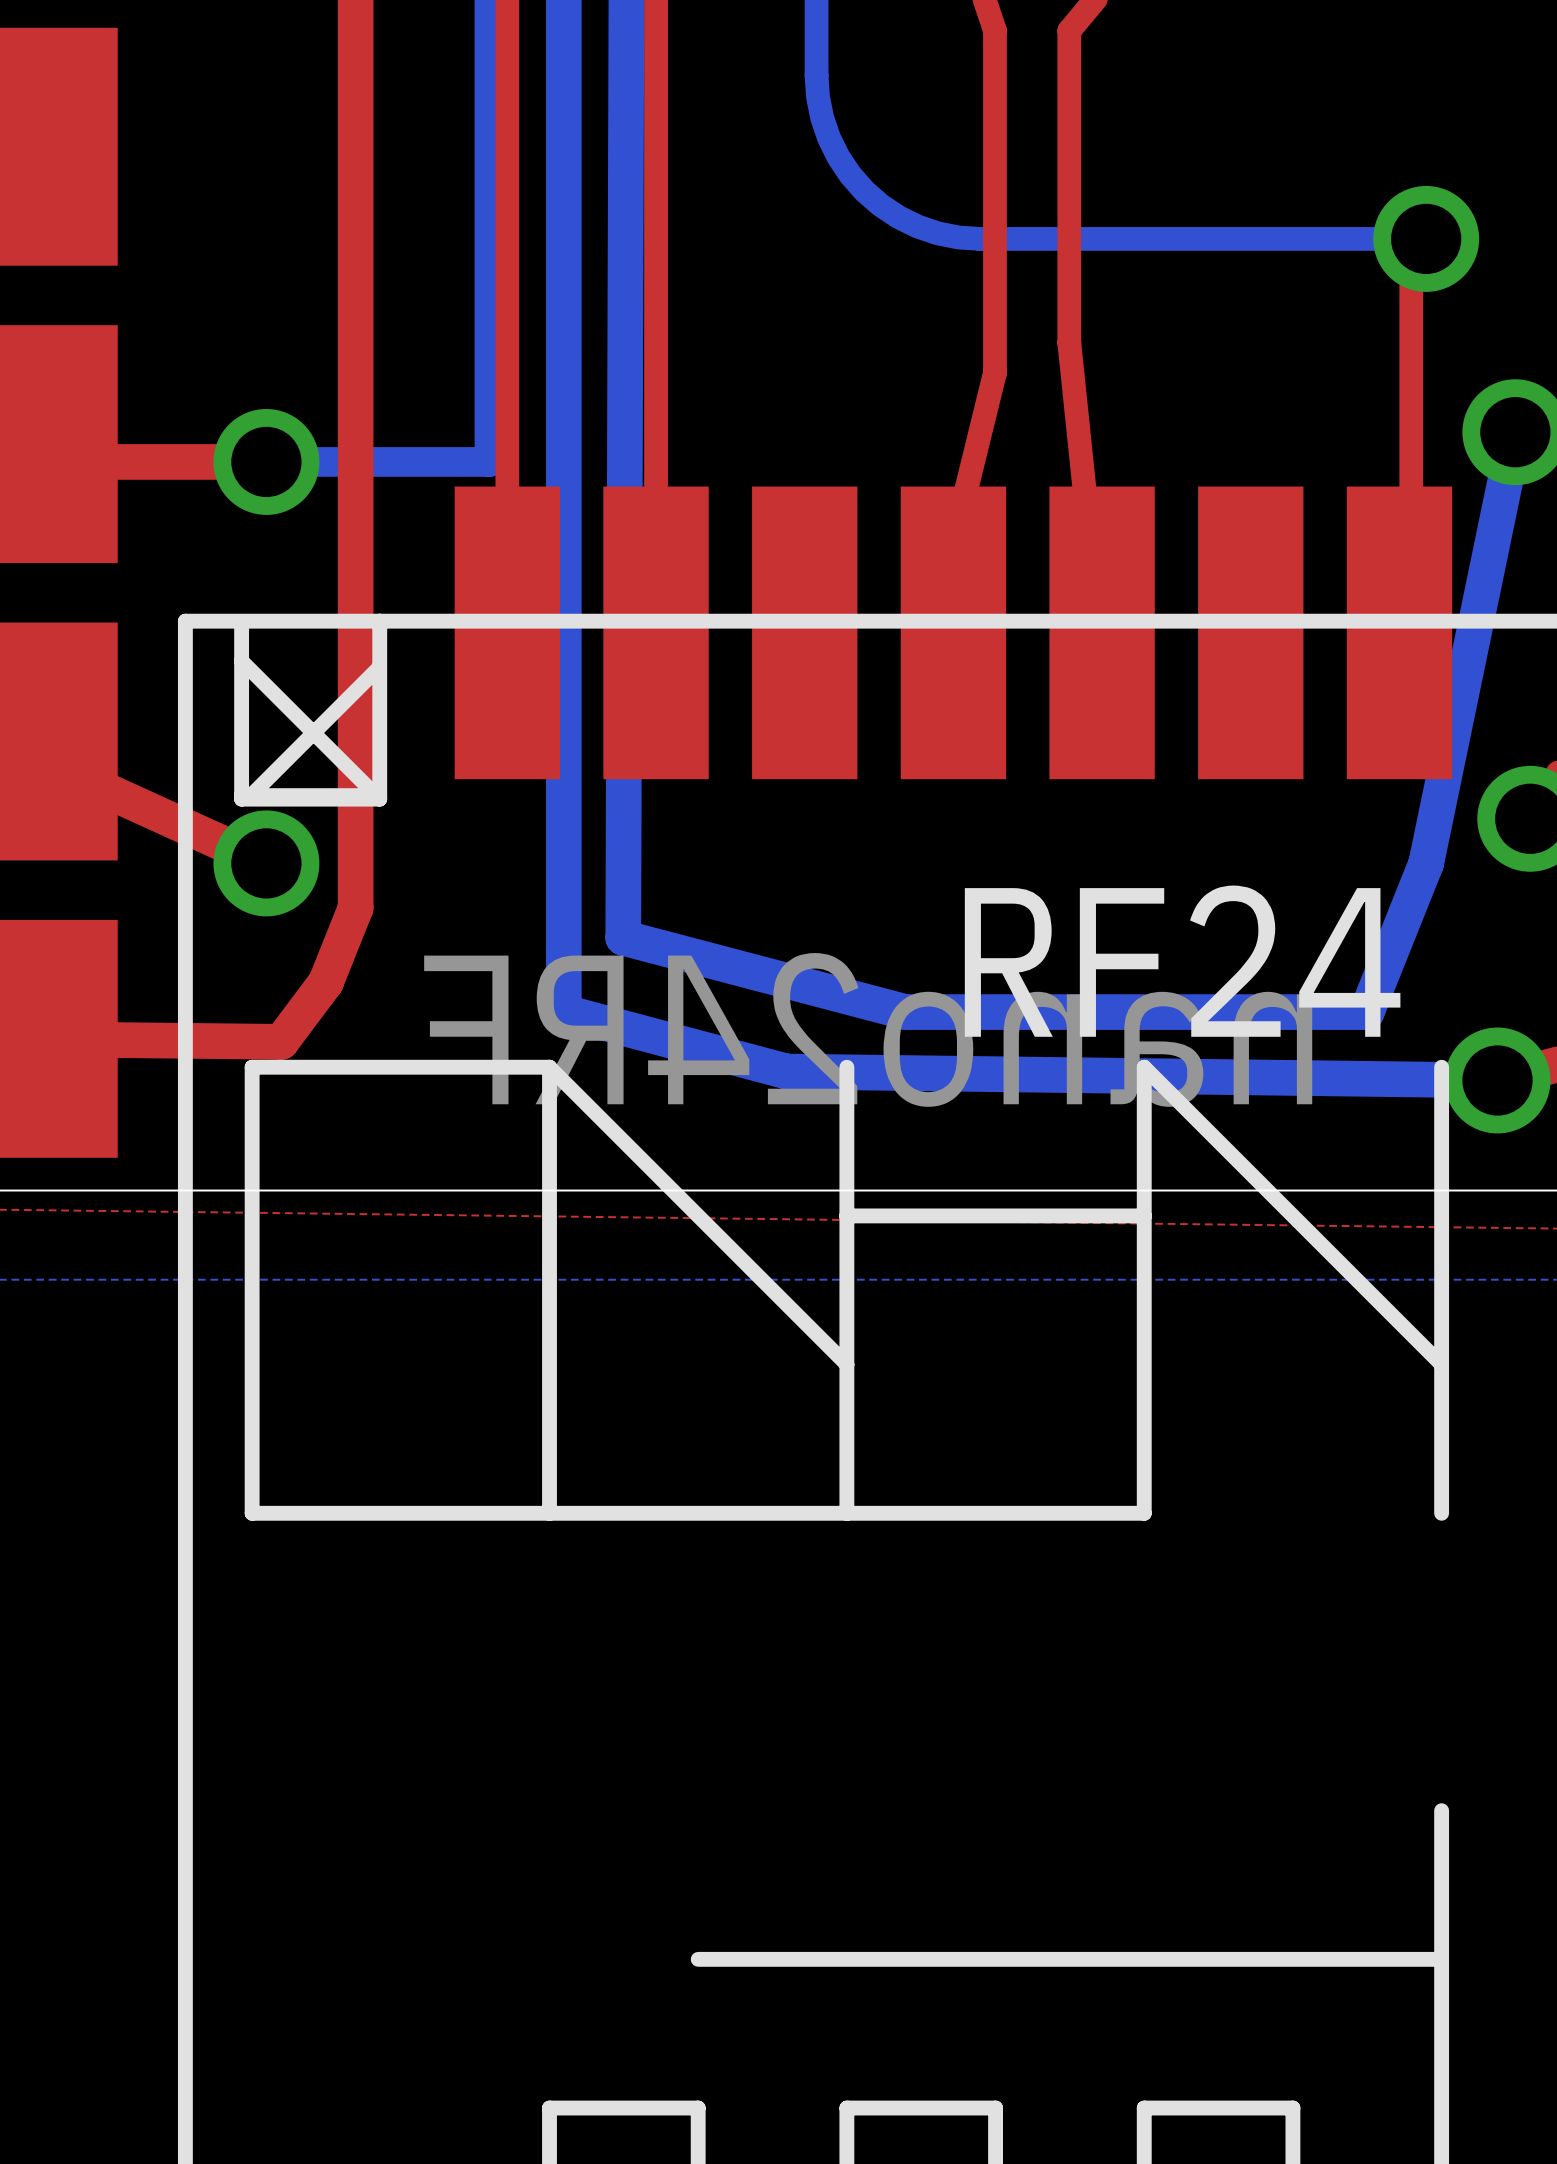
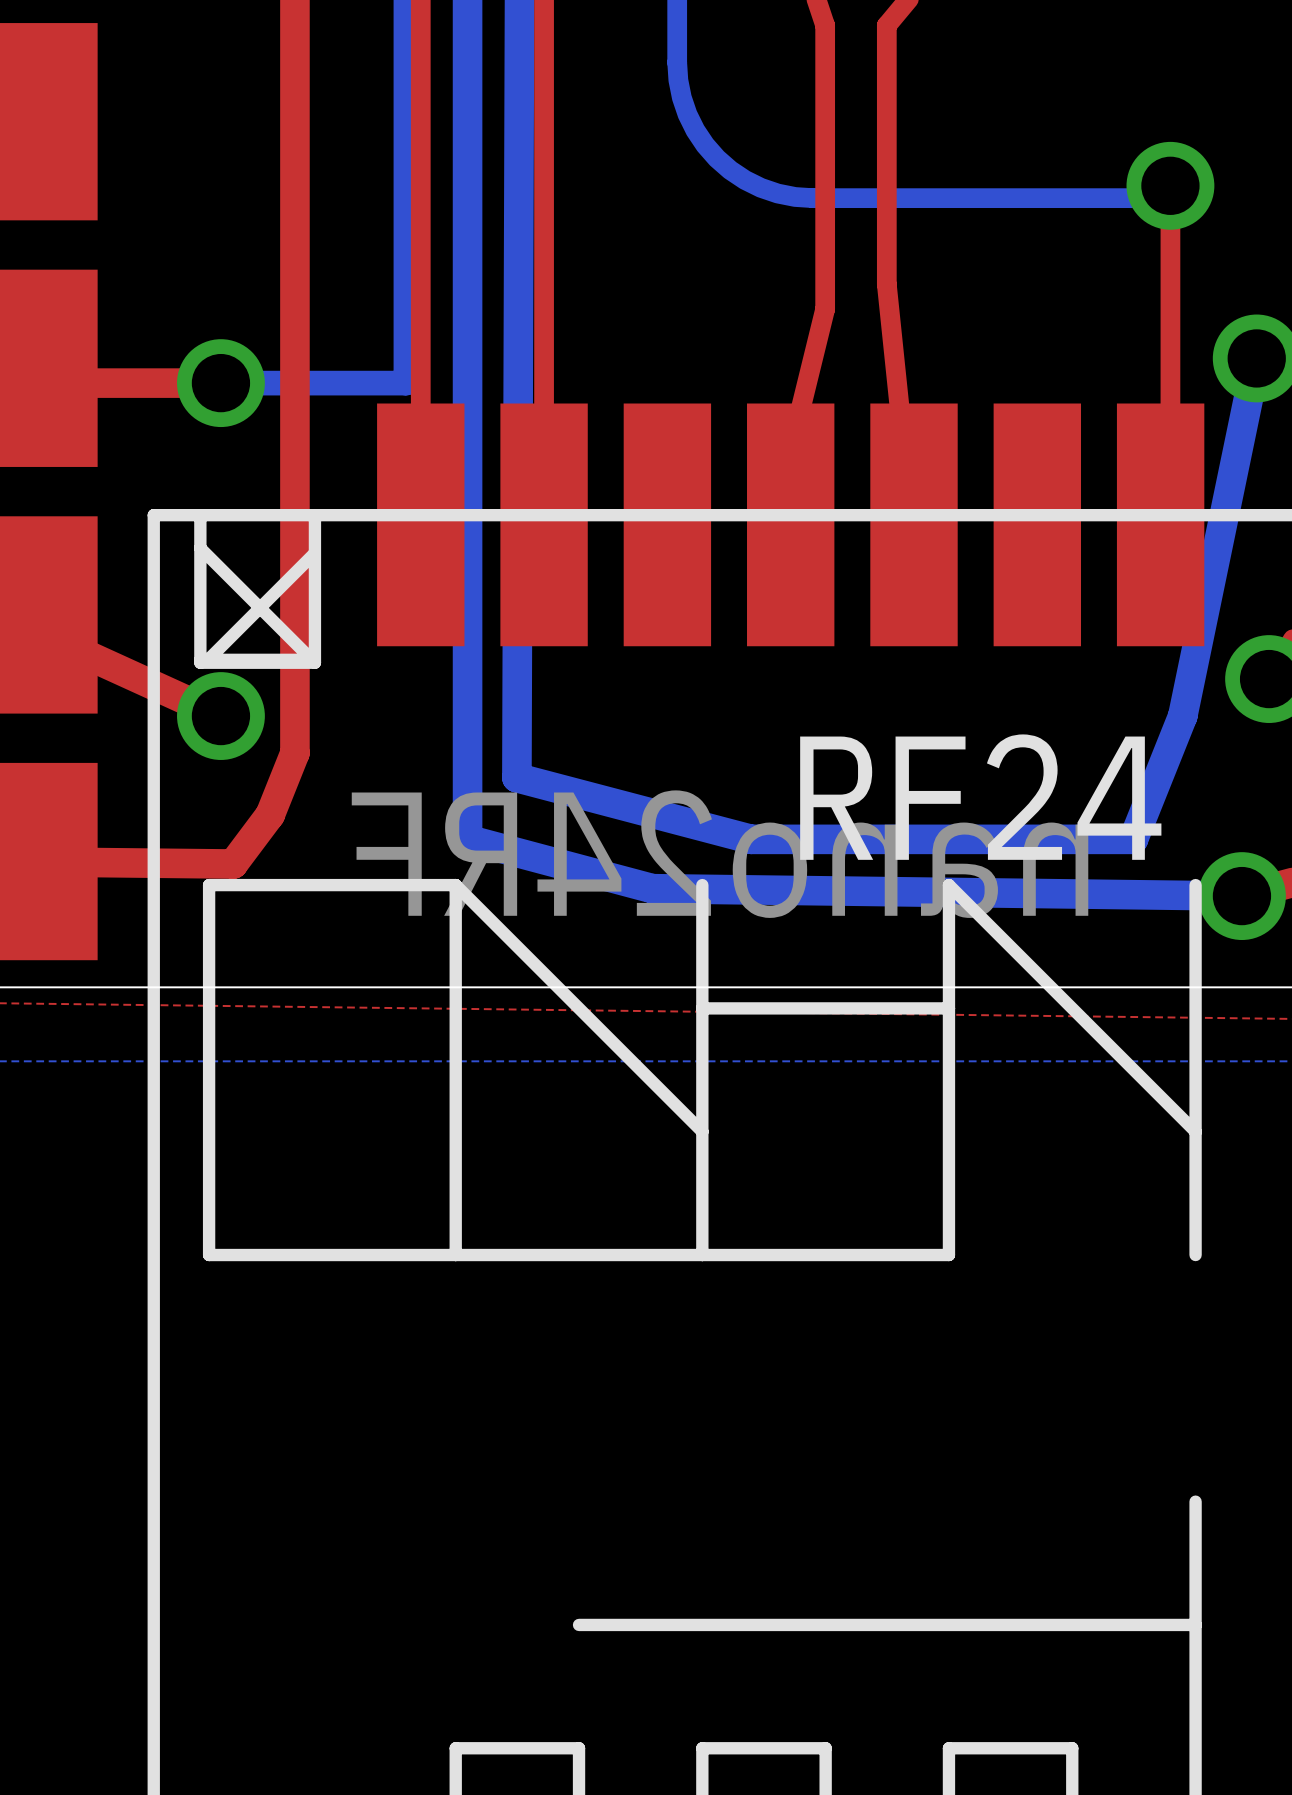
via position: (1426, 238) -> (1170, 185)

